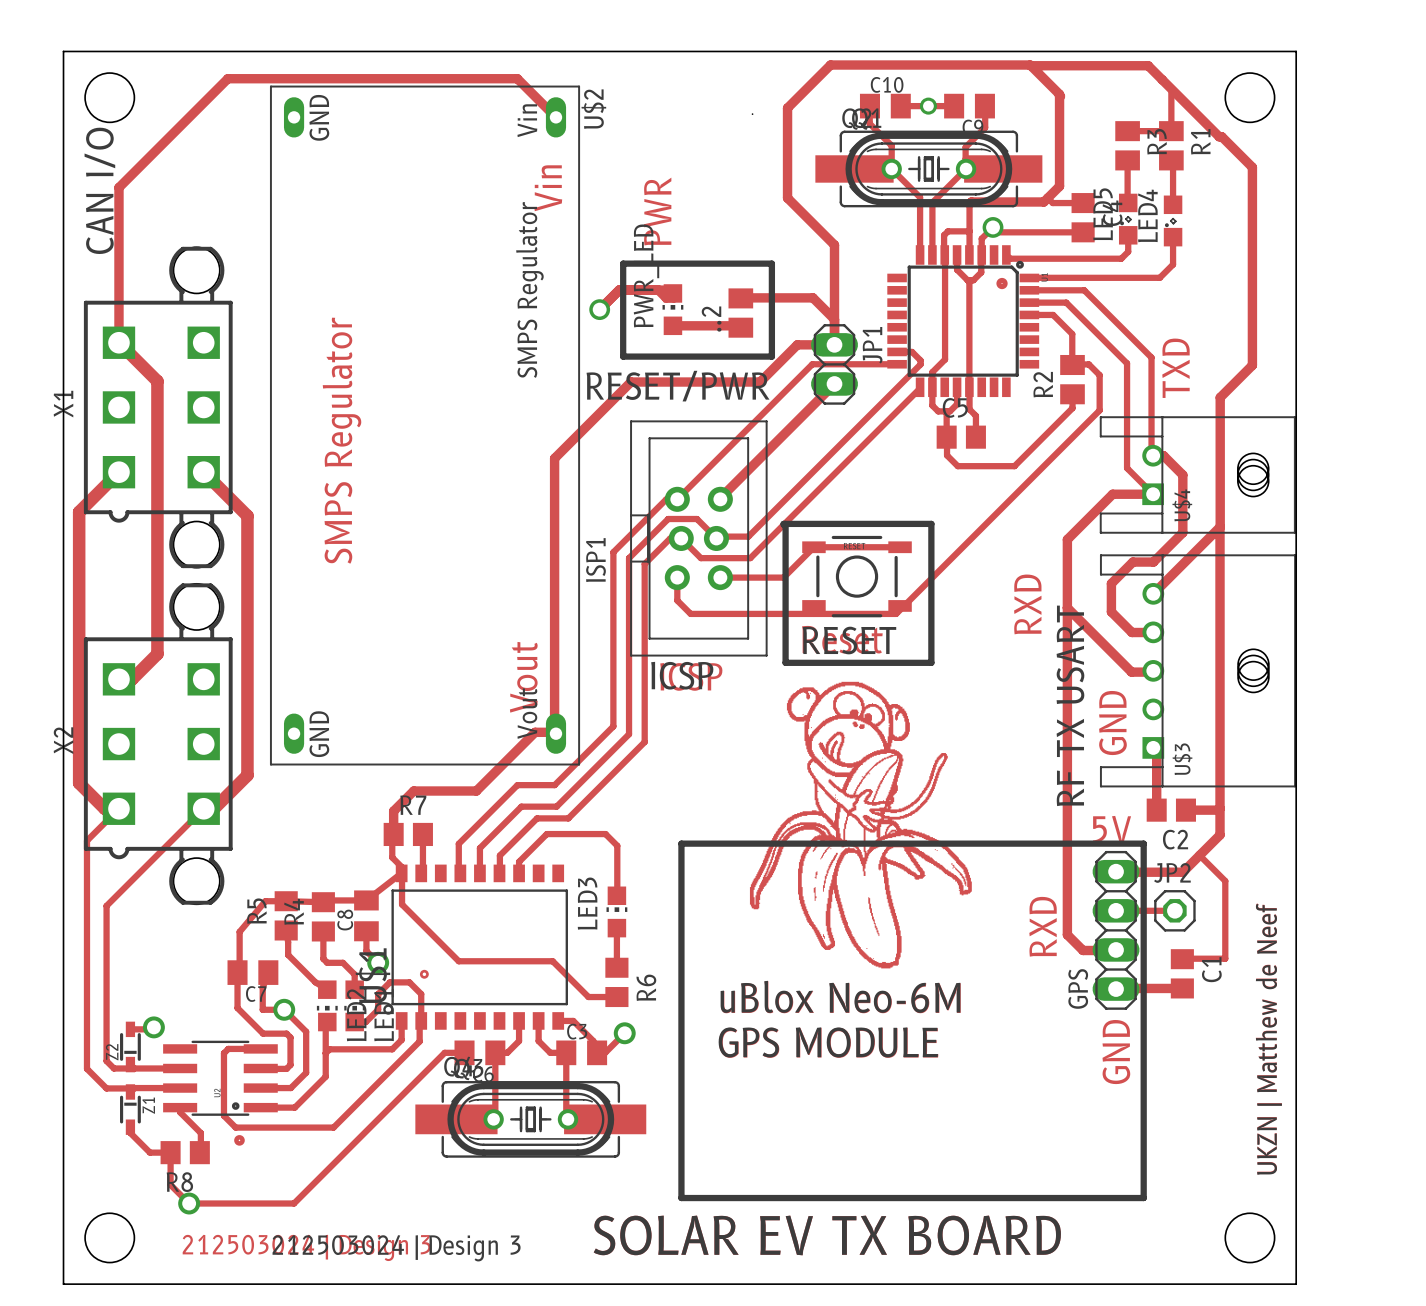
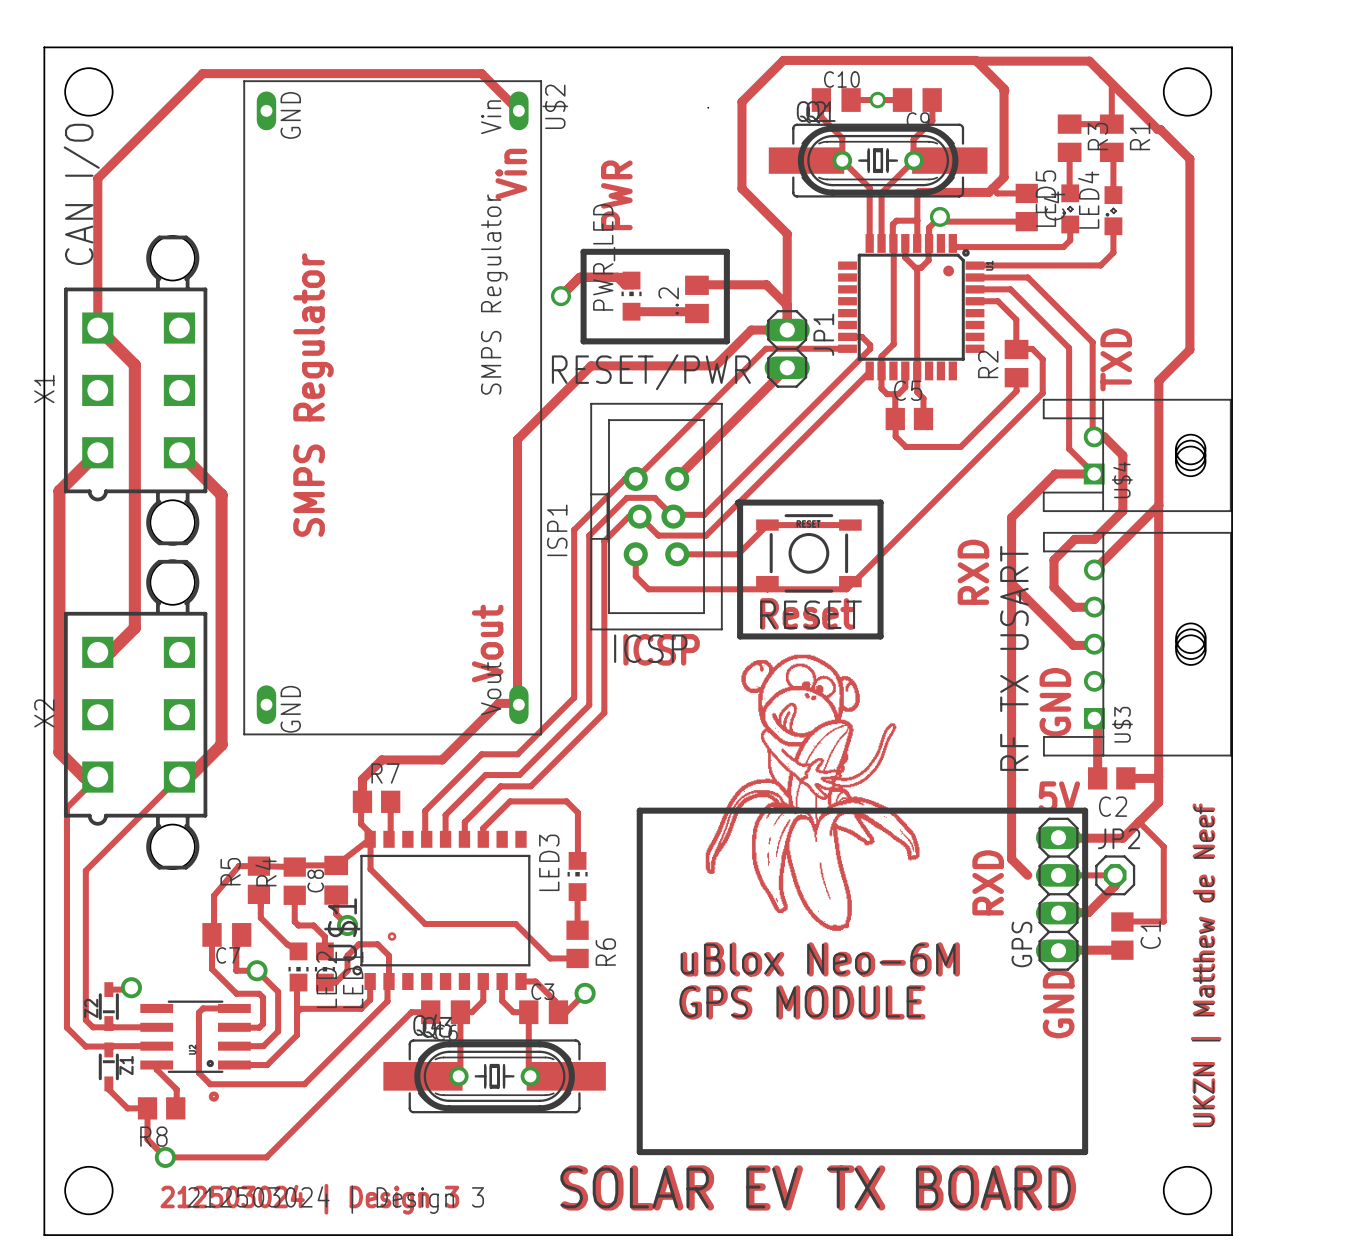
track: (1067, 894) (1067, 934) (1083, 950) (1116, 949) -> (1011, 859) (1027, 875)
track: none -> (1115, 875) (1115, 885) (1088, 912) (1058, 913)

